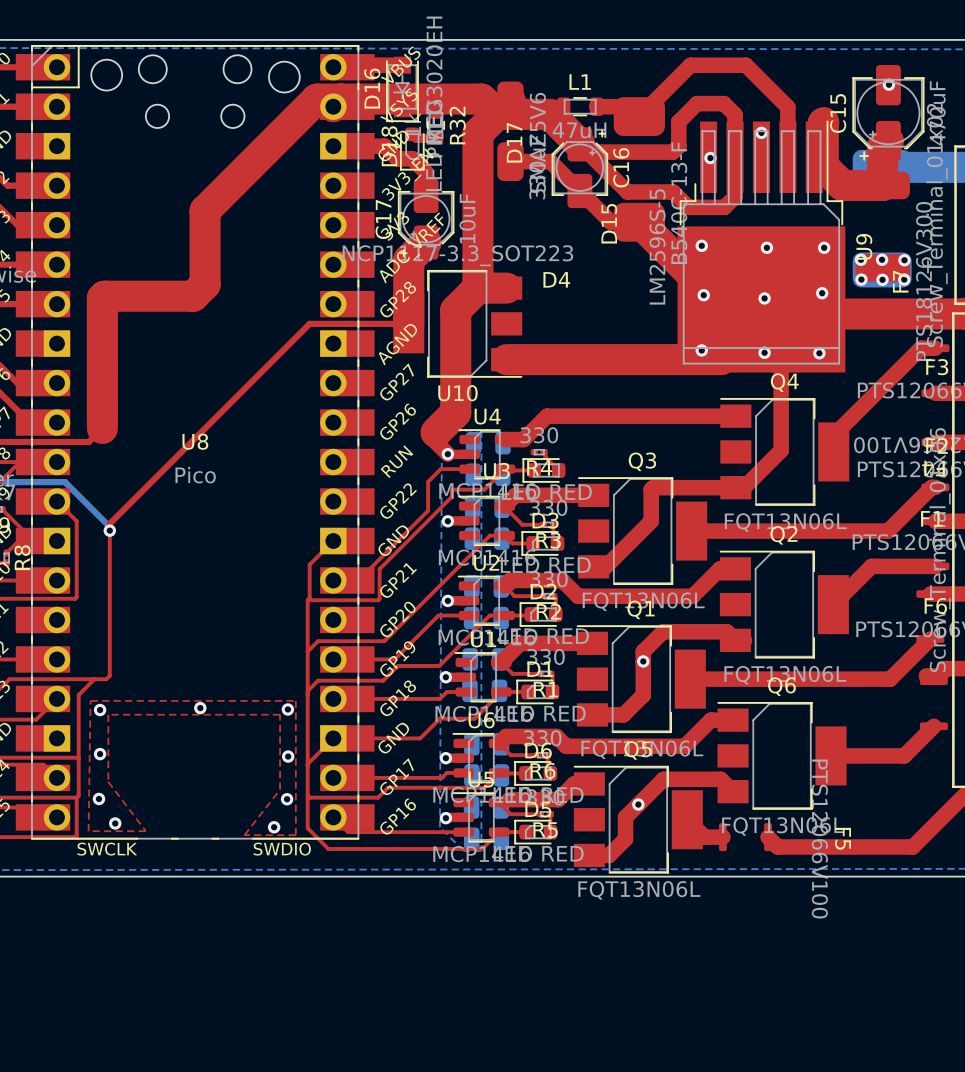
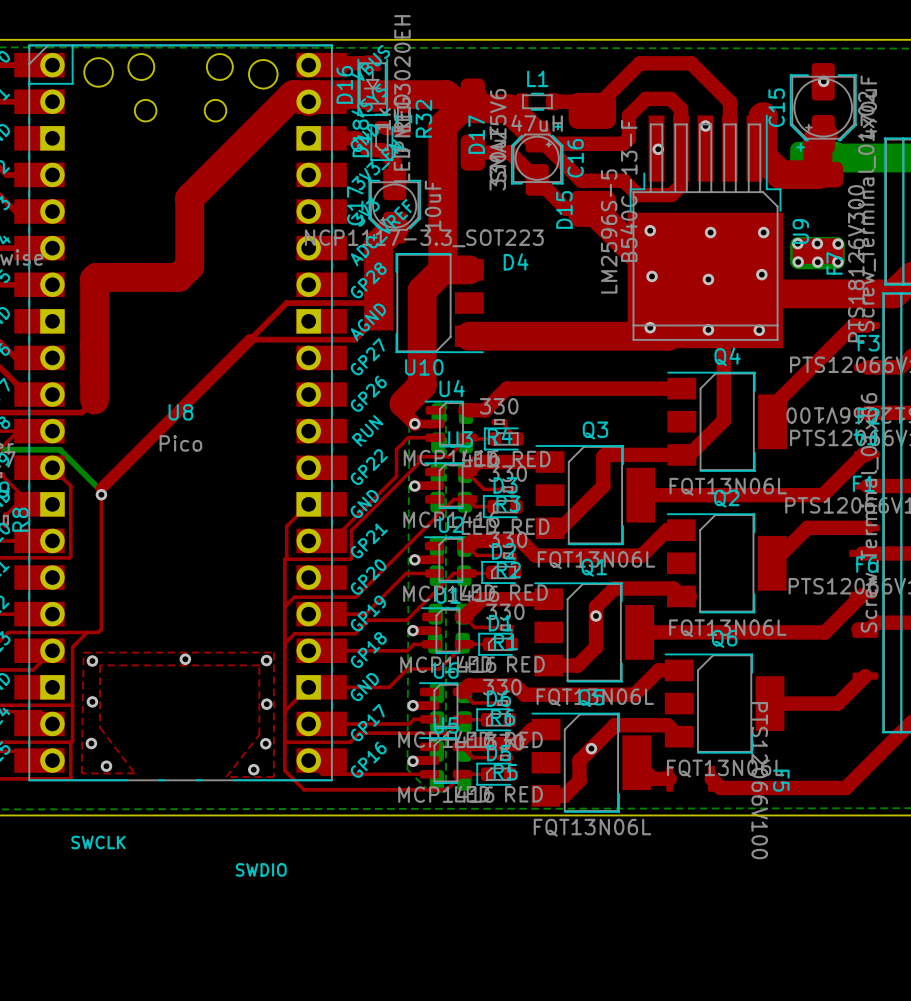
top track: none -> (378, 303) (378, 316) (354, 339) (250, 339)
top track width: thin (270, 363) (109, 523) -> thick (250, 339) (101, 488)
U8 text position: SWCLK (107, 849) -> SWCLK (98, 842)
U8 text position: SWDIO (282, 849) -> SWDIO (261, 869)

